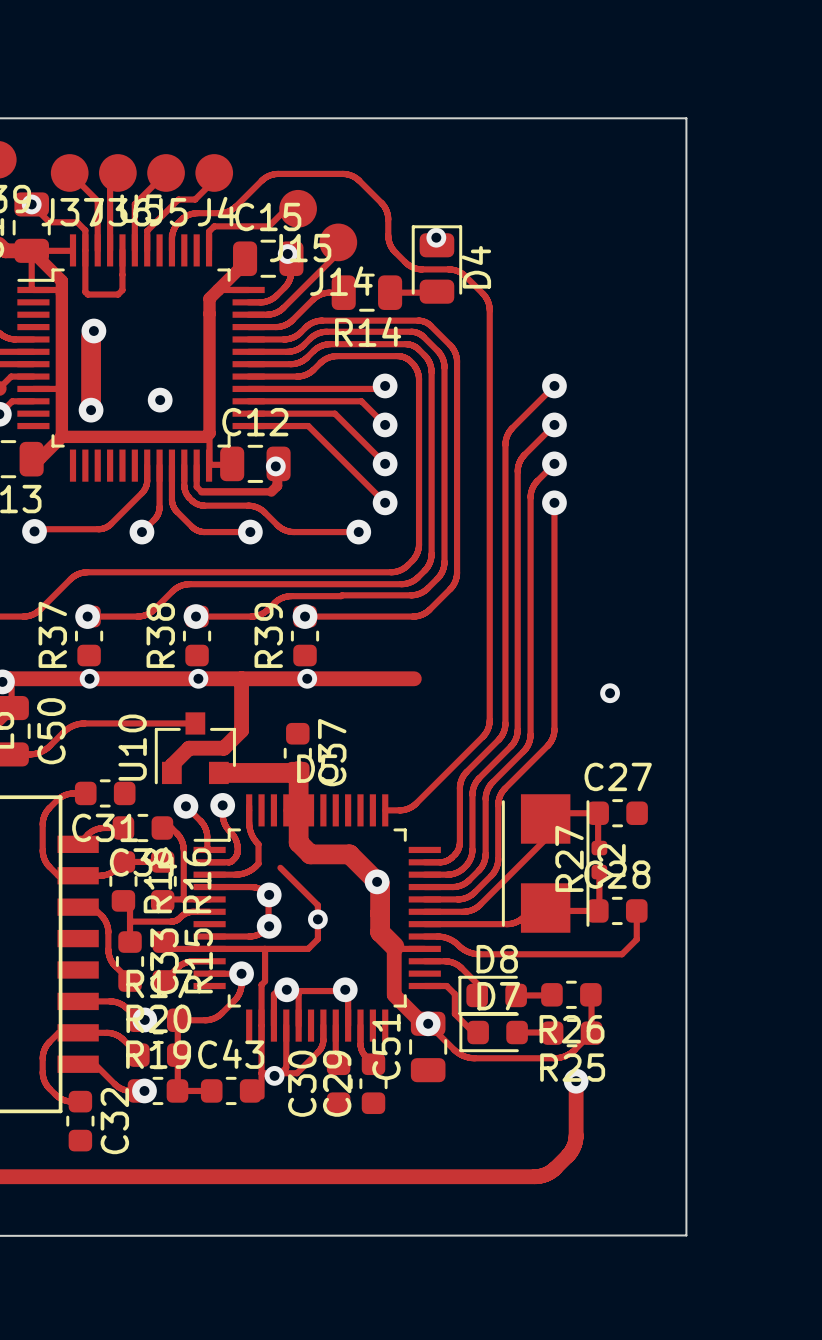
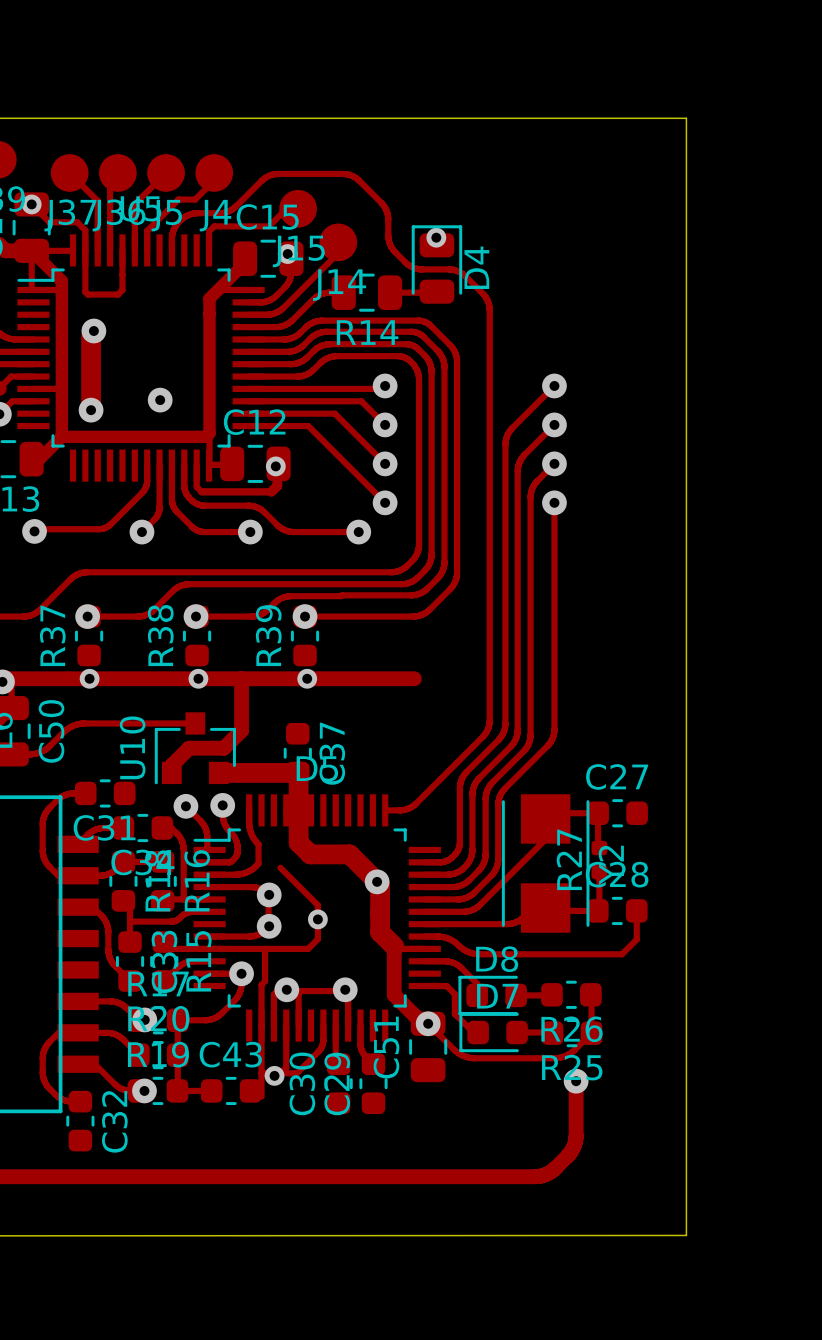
via: (610, 693) -> none

